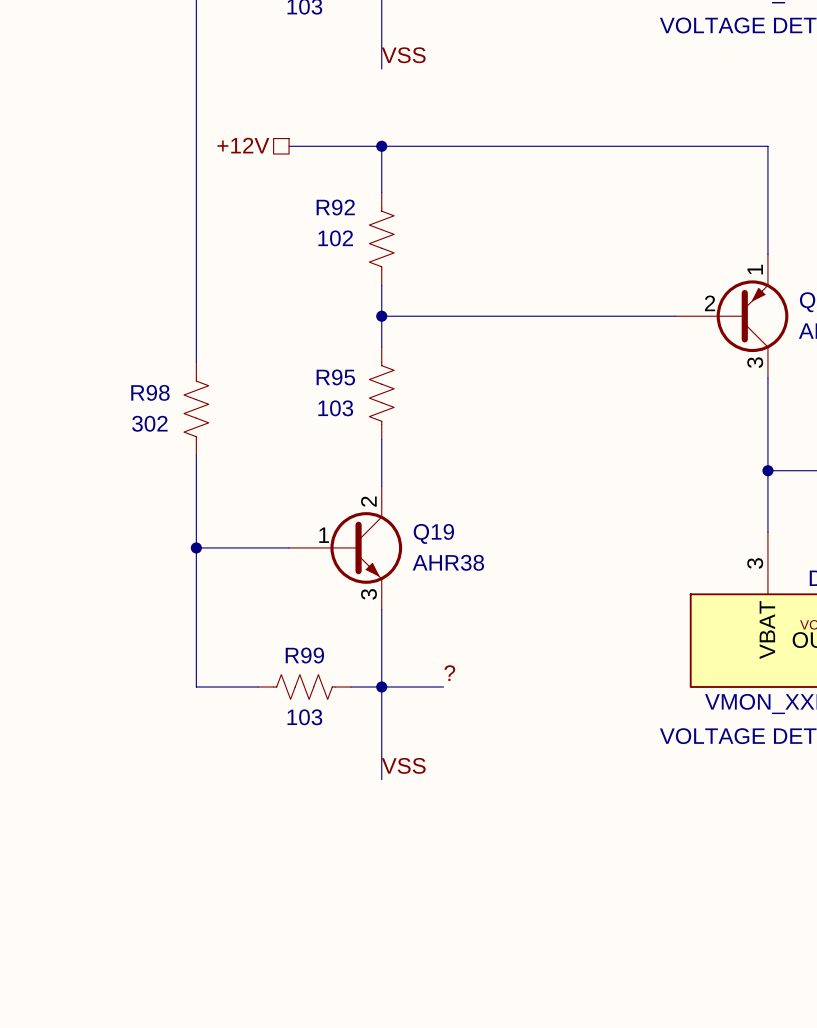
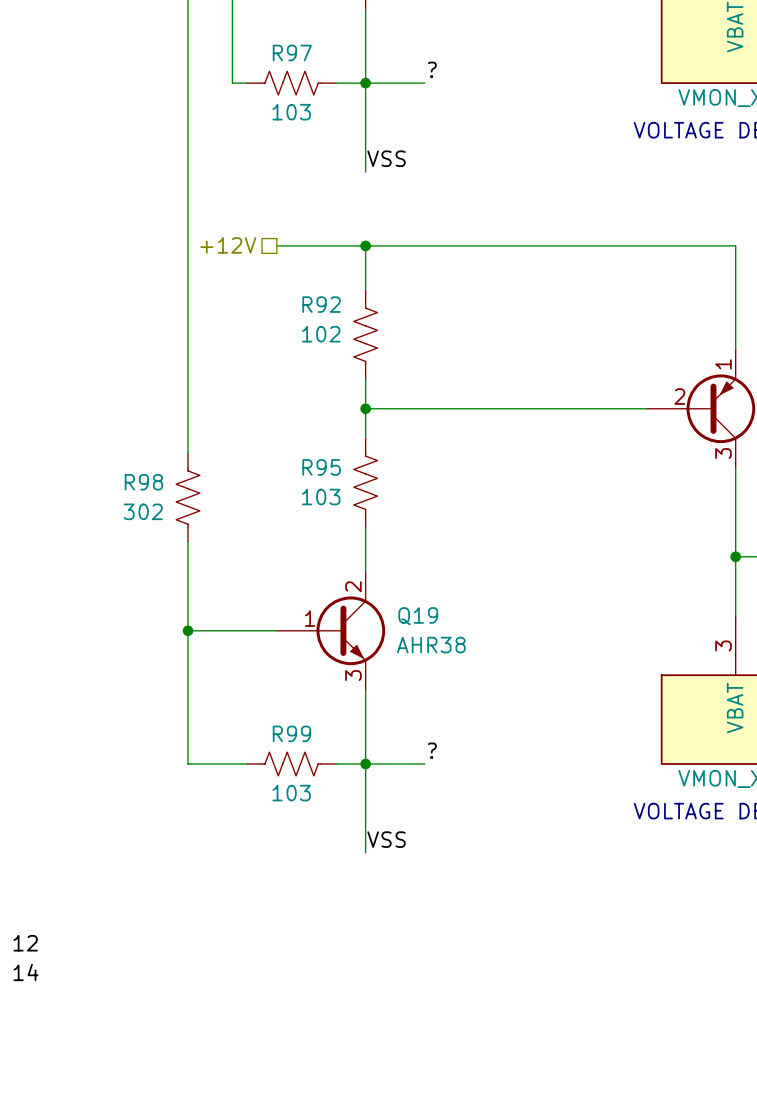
label: none -> 12 (25, 943)
label: none -> 14 (26, 972)

